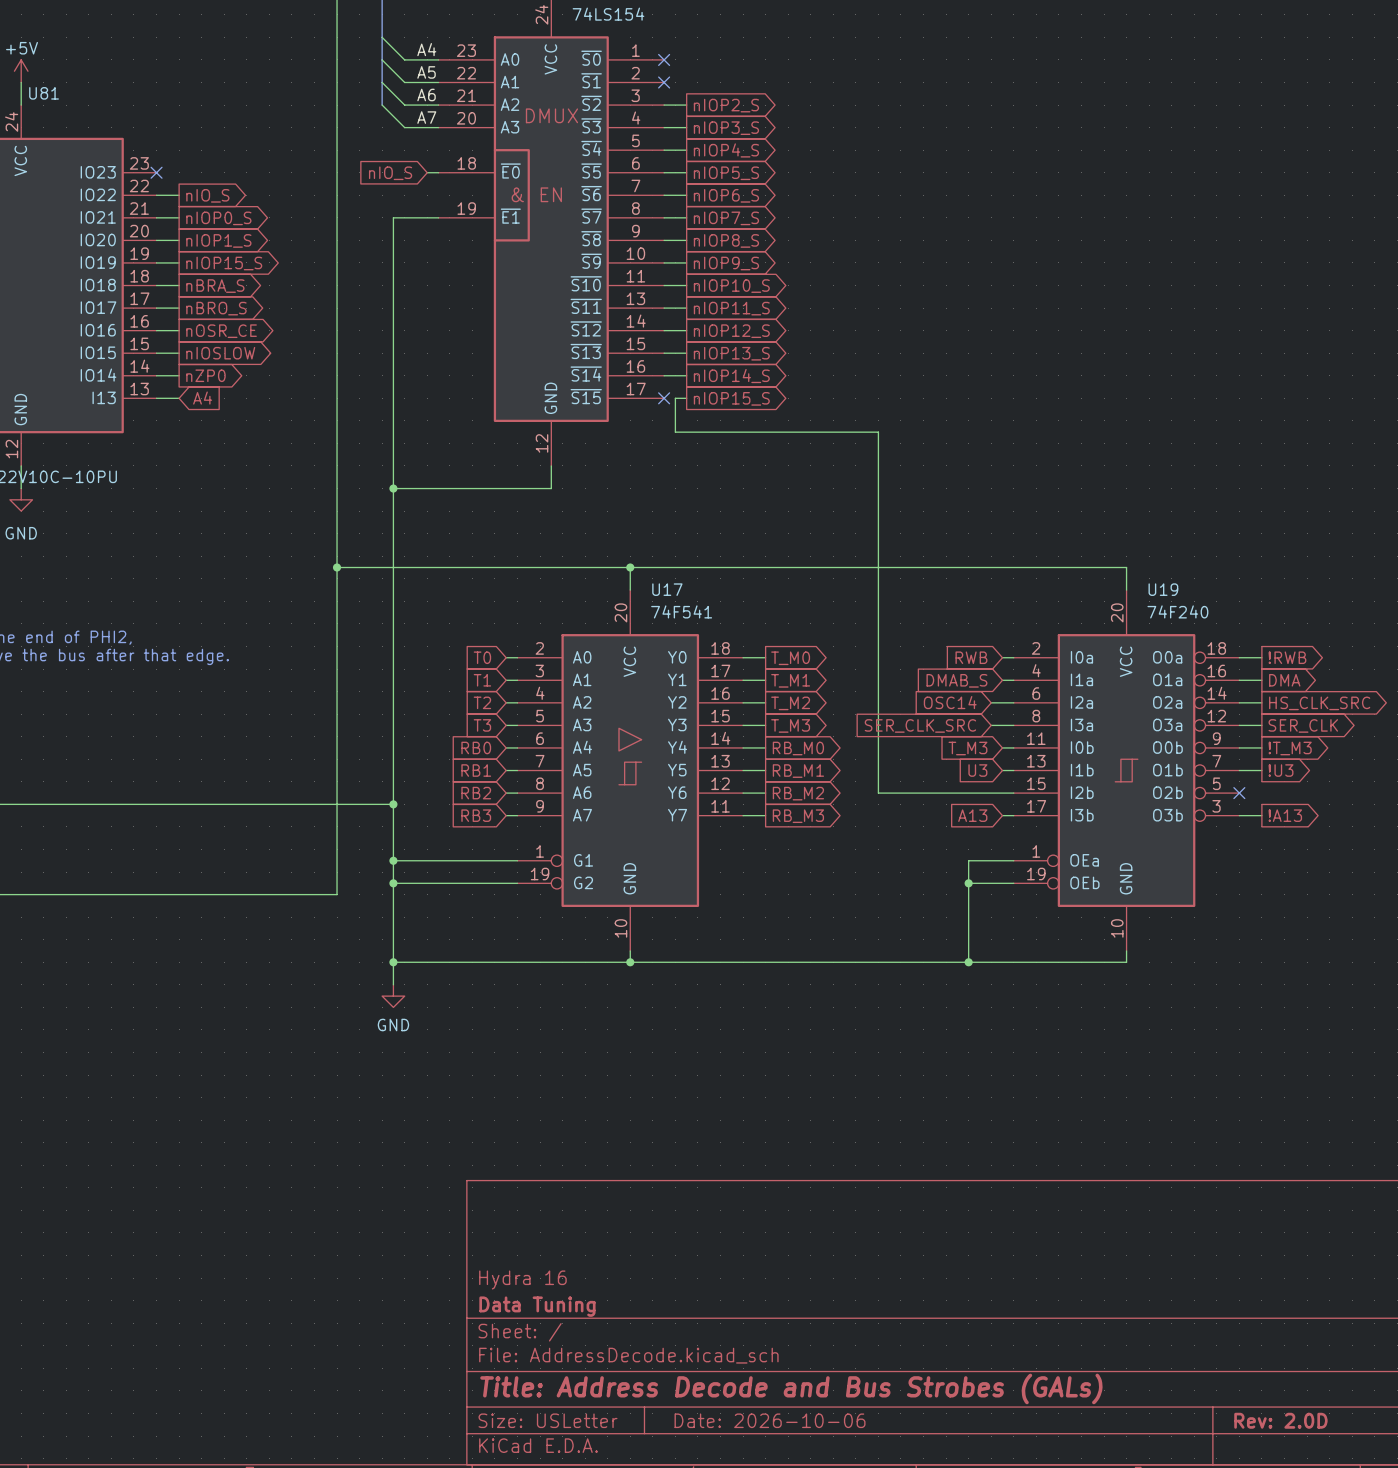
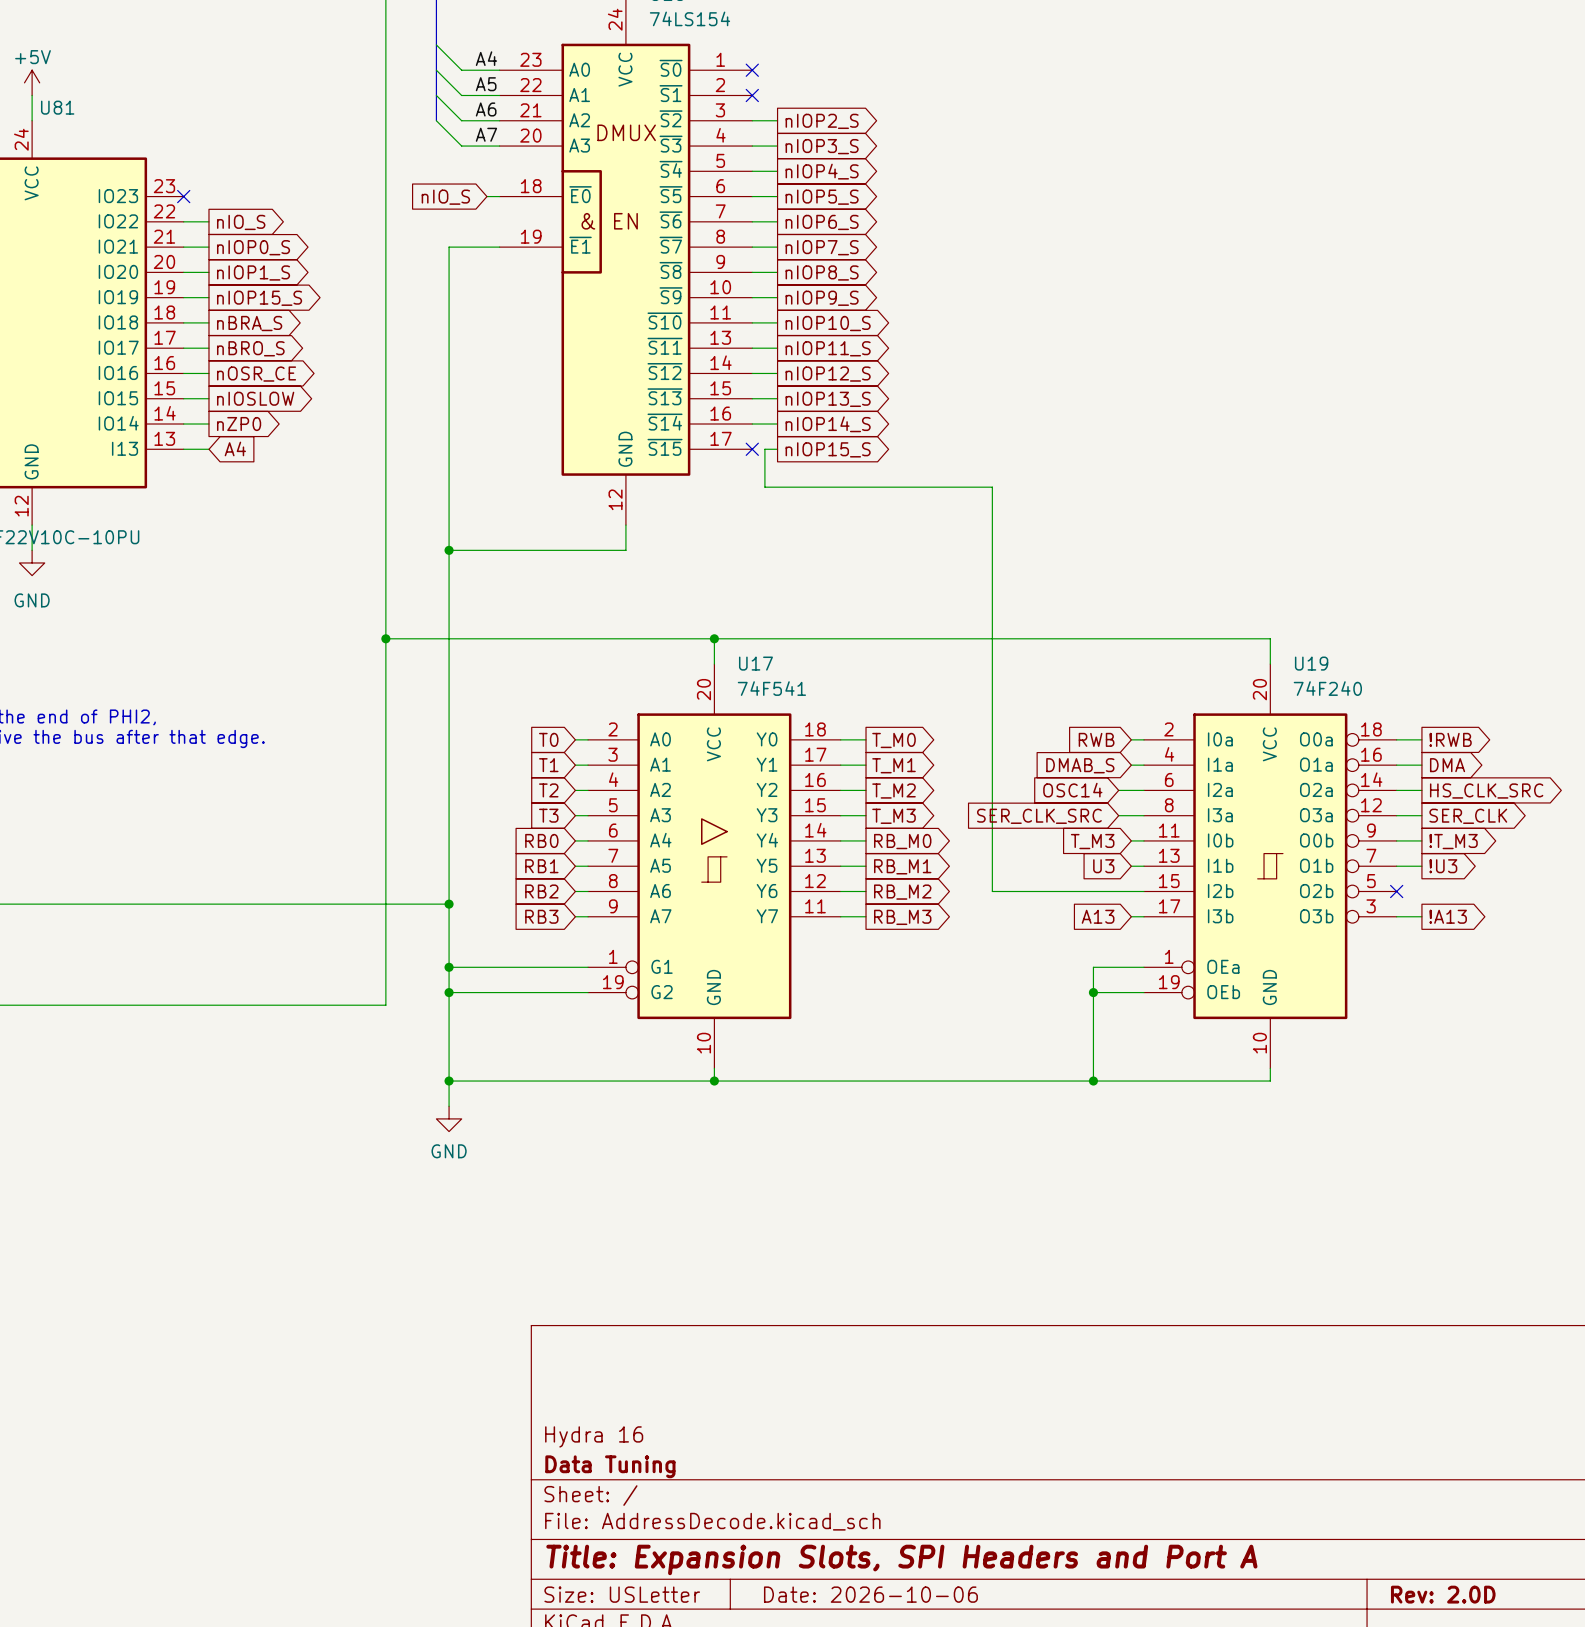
title block: Title: Address Decode and Bus Strobes (GALs) (791, 1388) -> Title: Expansion Slots, SPI Headers and Port A (901, 1559)

